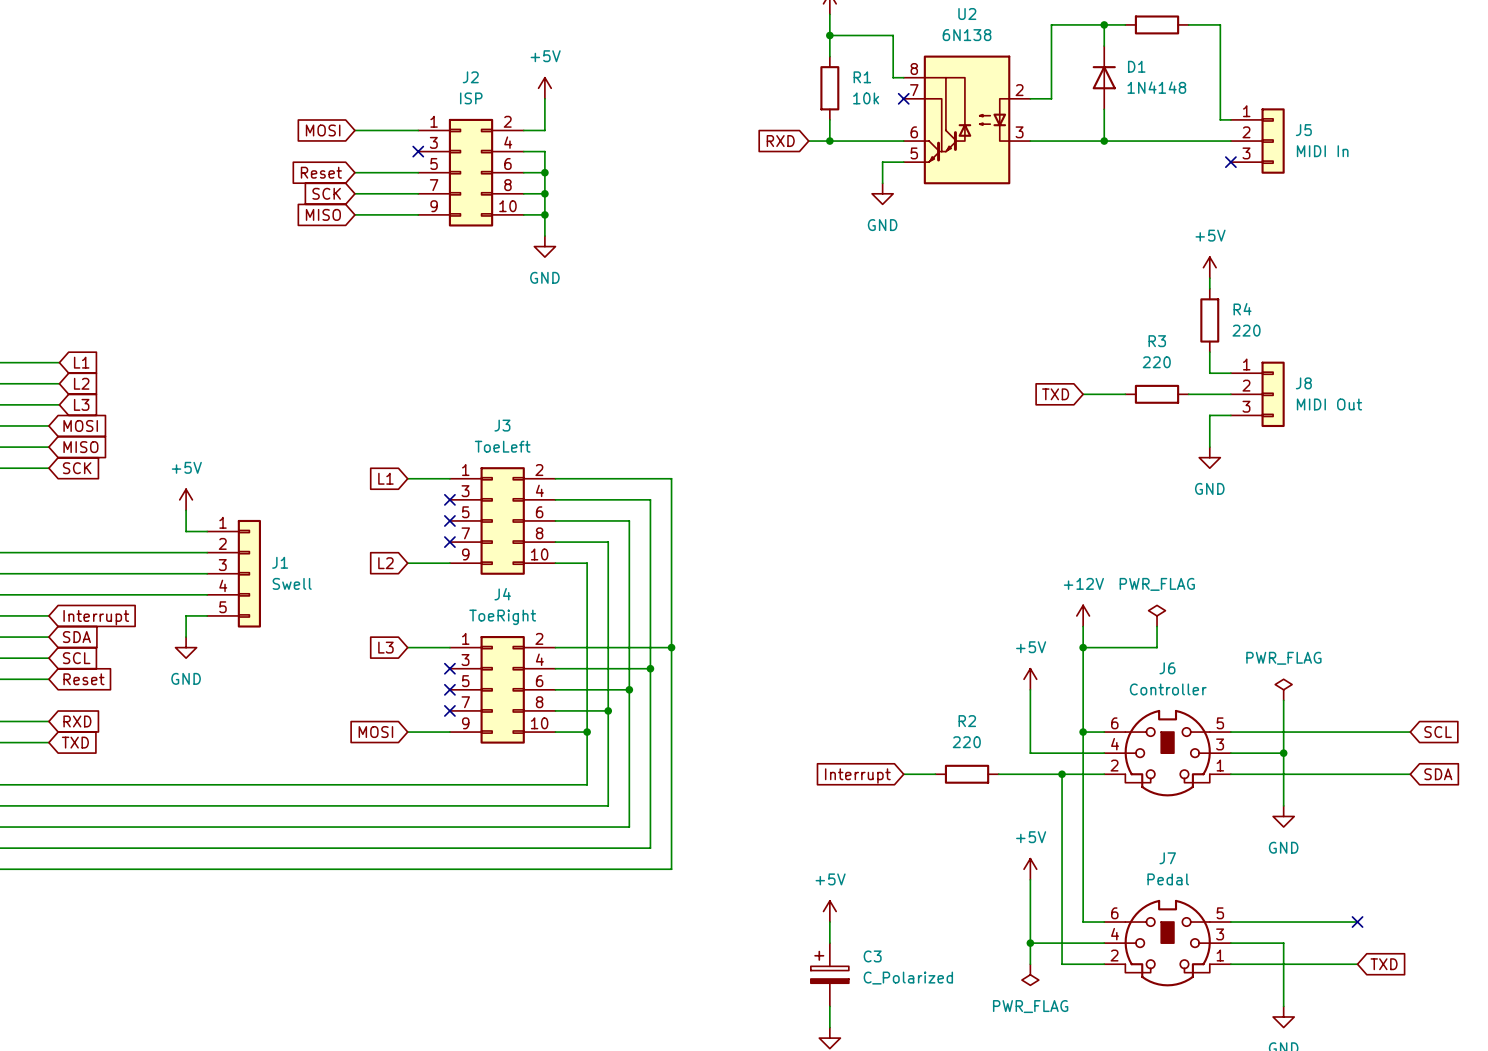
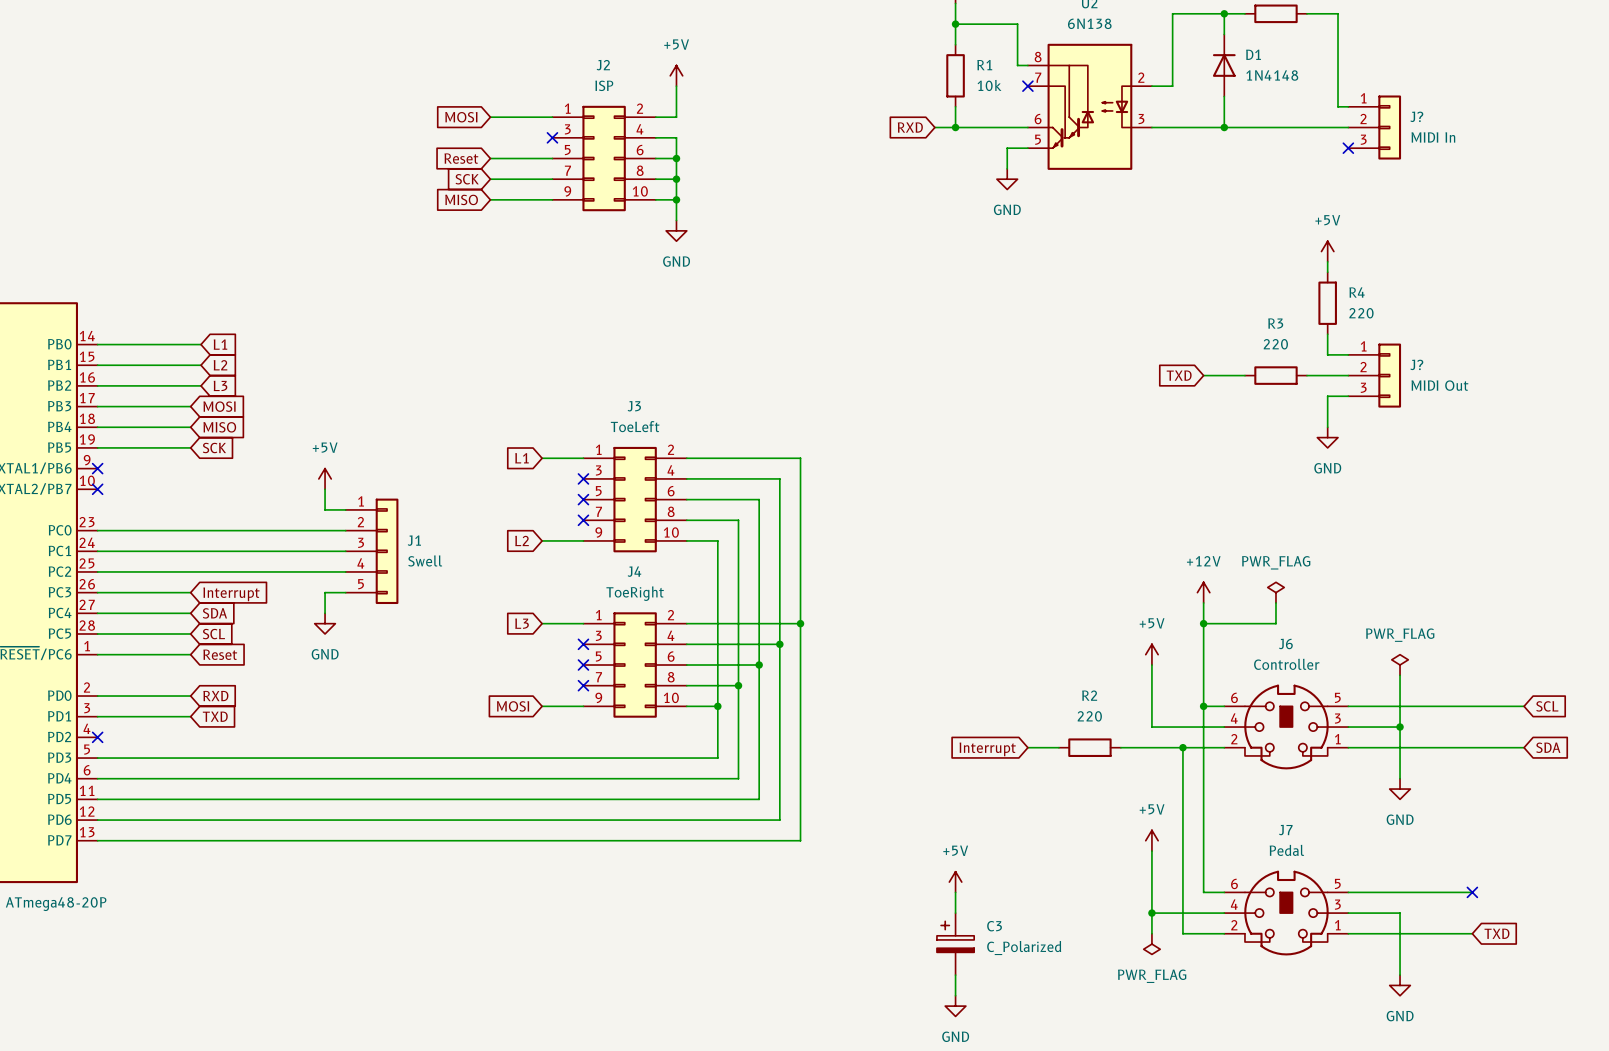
J5 name: J5 (1303, 130) -> J? (1416, 116)
J8 name: J8 (1303, 383) -> J? (1416, 364)

